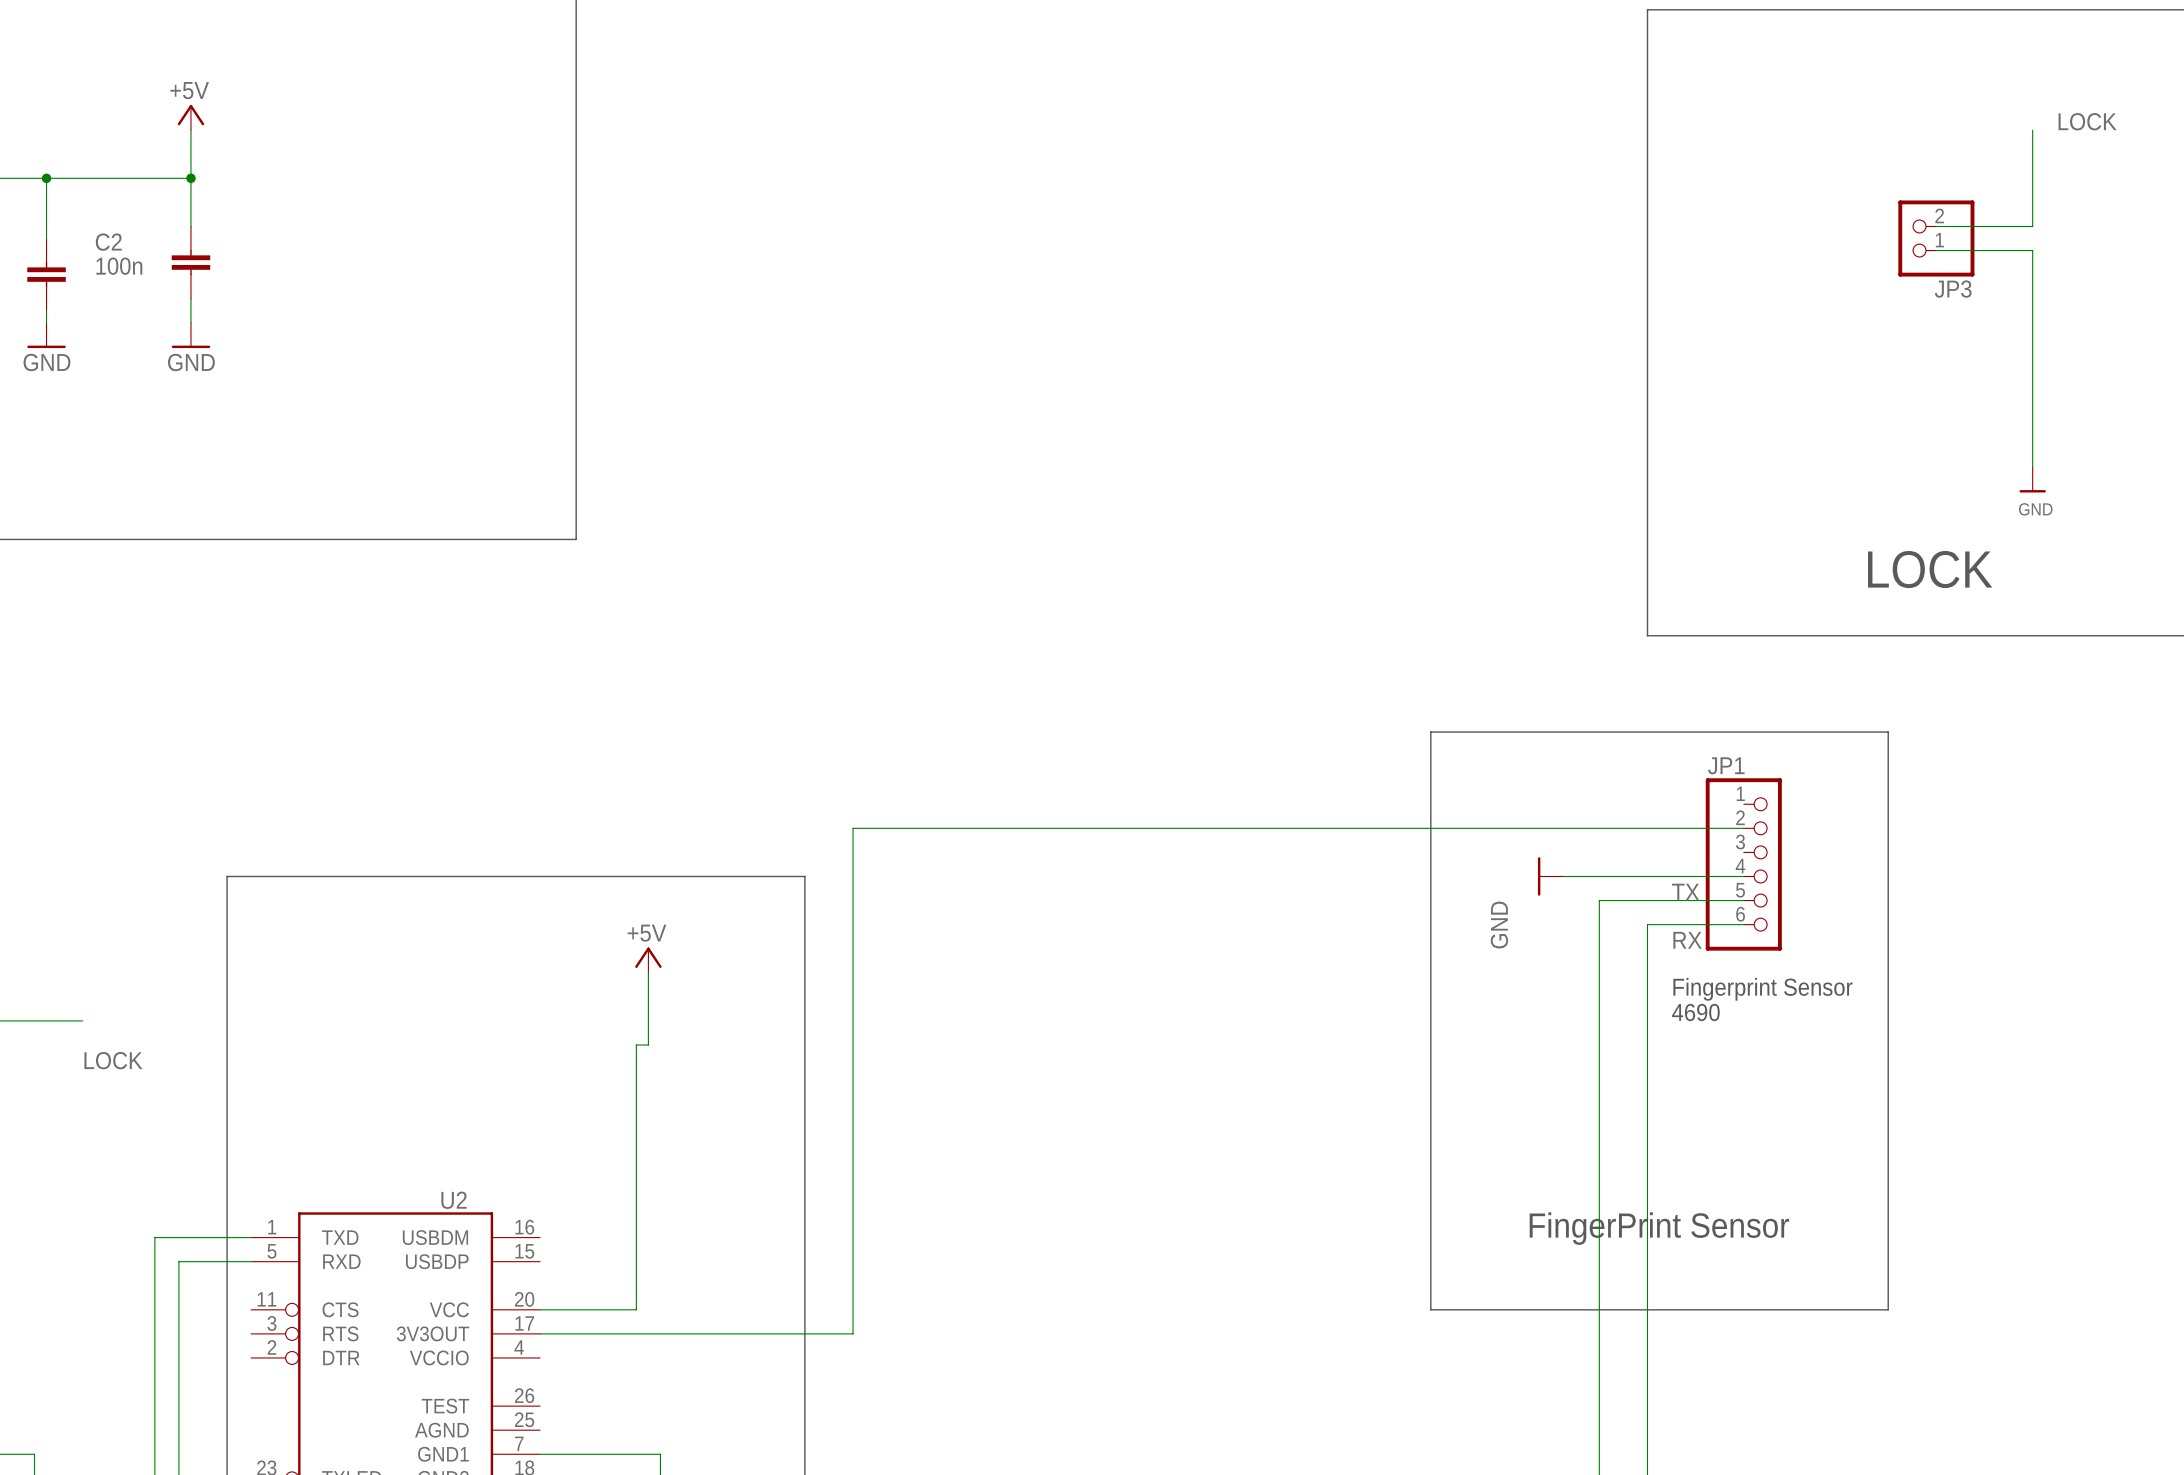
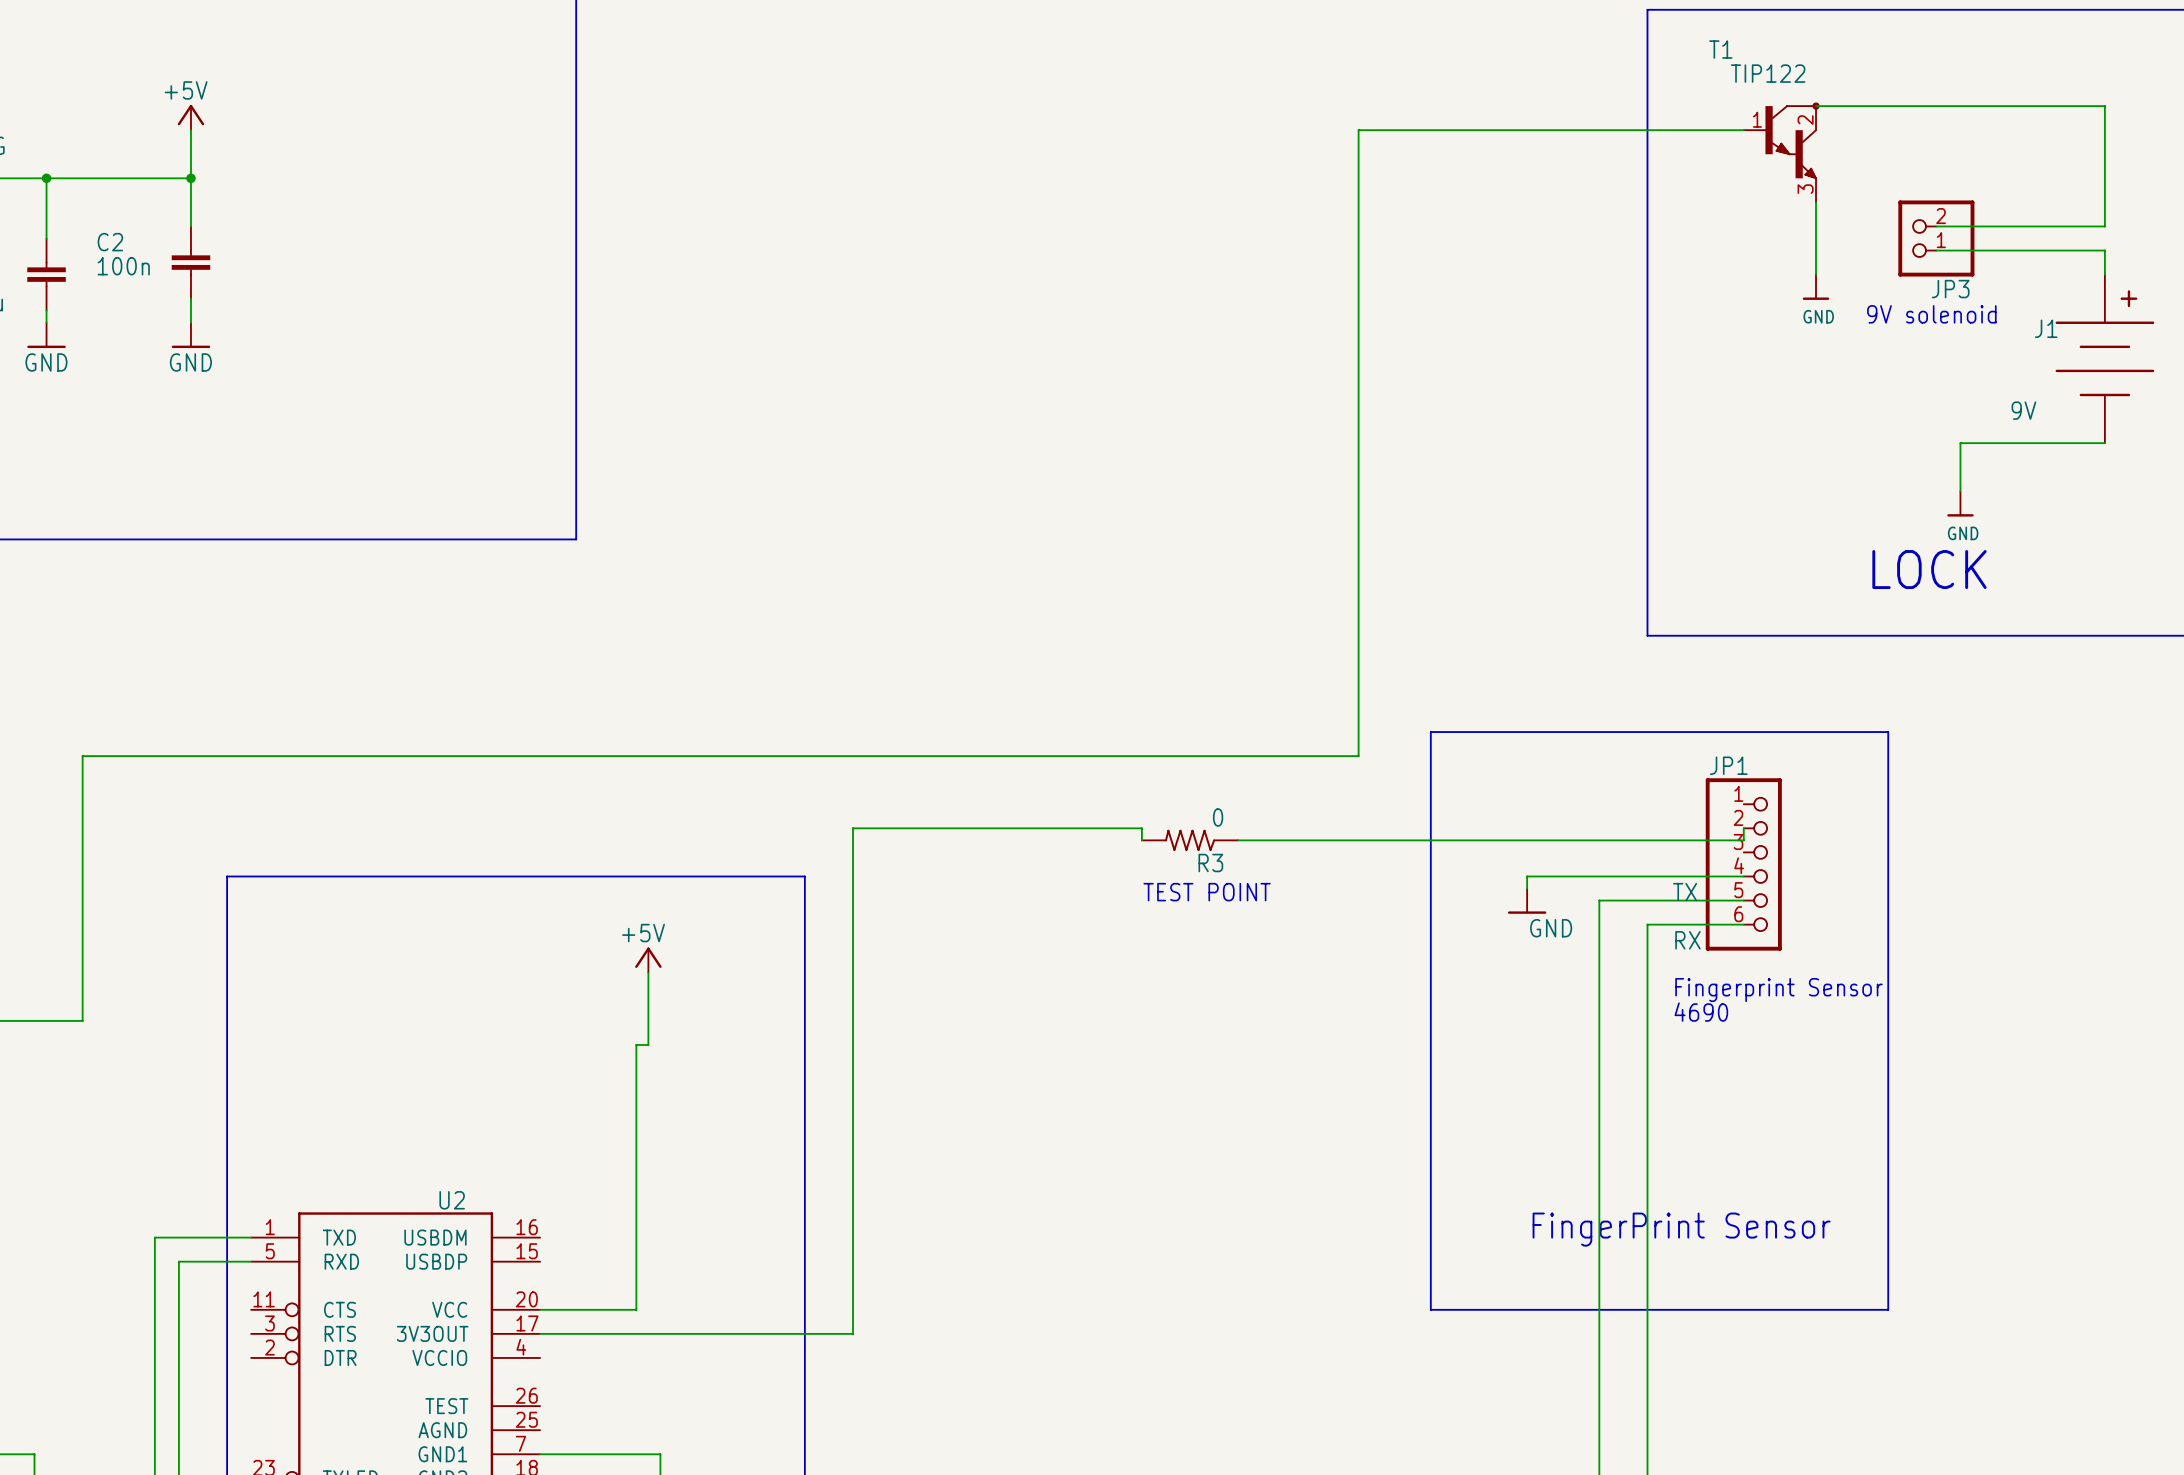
label: LOCK (2087, 121) -> none
wire: none -> (1743, 130) (1358, 130) (1358, 756) (82, 756) (82, 1020)
wire: (2032, 130) (2032, 226) -> (1816, 106) (2104, 106) (2104, 226) (2032, 226)
T1: none -> TIP122 (1781, 152)
wire: none -> (1816, 202) (1816, 274)
wire: (2032, 250) (2032, 467) -> (2032, 250) (2104, 250) (2104, 274)
power symbol: none -> GND (1816, 287)
text: none -> 9V solenoid (1931, 314)
J1: none -> 9V (2104, 358)
wire: none -> (2104, 443) (1960, 443) (1960, 491)
power symbol position: GND (2032, 479) -> GND (1960, 503)
wire: (1141, 828) (1743, 828) -> (1238, 840) (1743, 840) (1743, 828)
wire: none -> (1141, 828) (1141, 840)
R3: none -> 0 (1190, 840)
power symbol rotation: 0° (1539, 876) -> 90° counterclockwise (1527, 912)
power symbol position: GND (1550, 876) -> GND (1527, 901)
wire: none -> (1563, 876) (1527, 876) (1527, 888)
text: none -> TEST POINT (1207, 892)
power symbol text position: GND (1499, 925) -> GND (1551, 928)
label: LOCK (113, 1060) -> none

